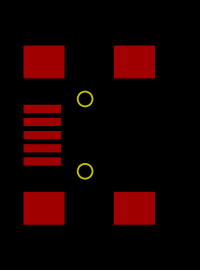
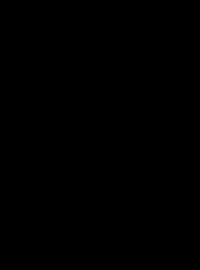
part: (89, 135) -> none

